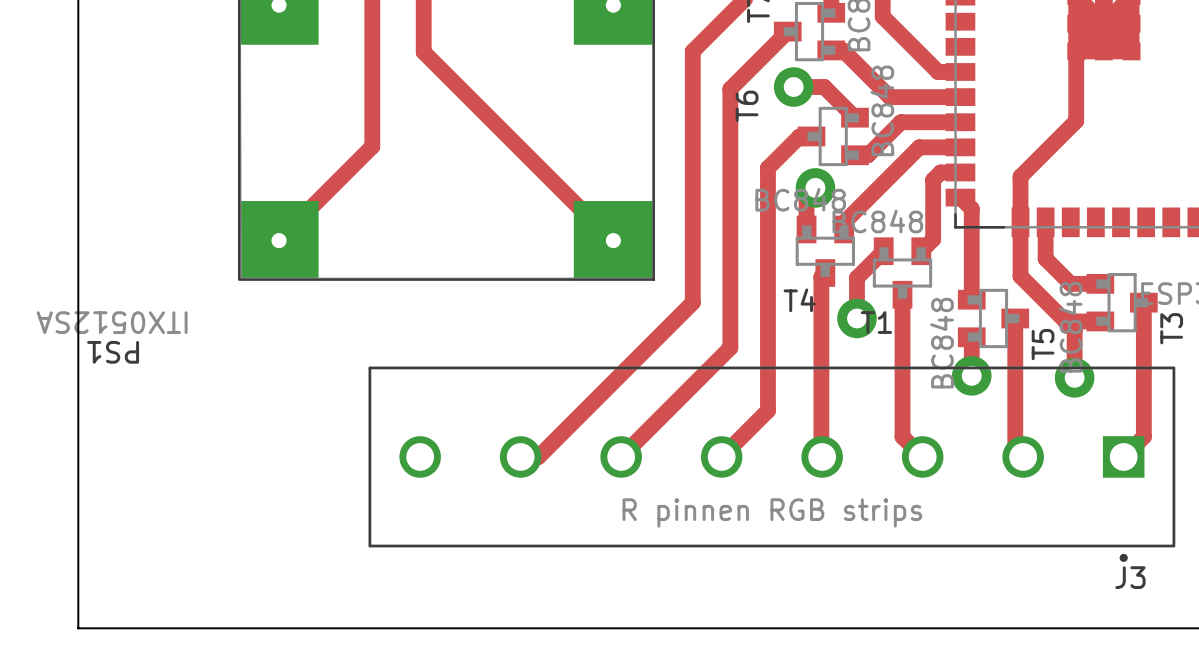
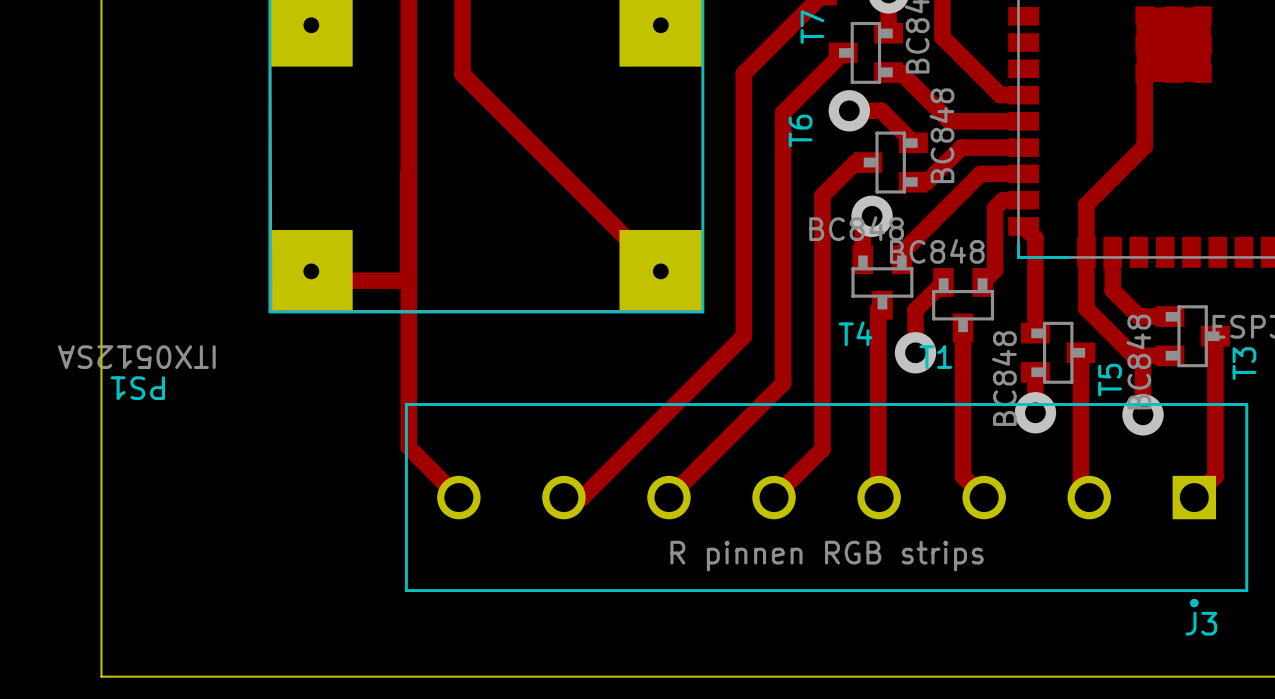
top track: (372, 146) (269, 249) -> (408, 280) (301, 280)
top track: none -> (408, 173) (408, 447) (458, 497)

